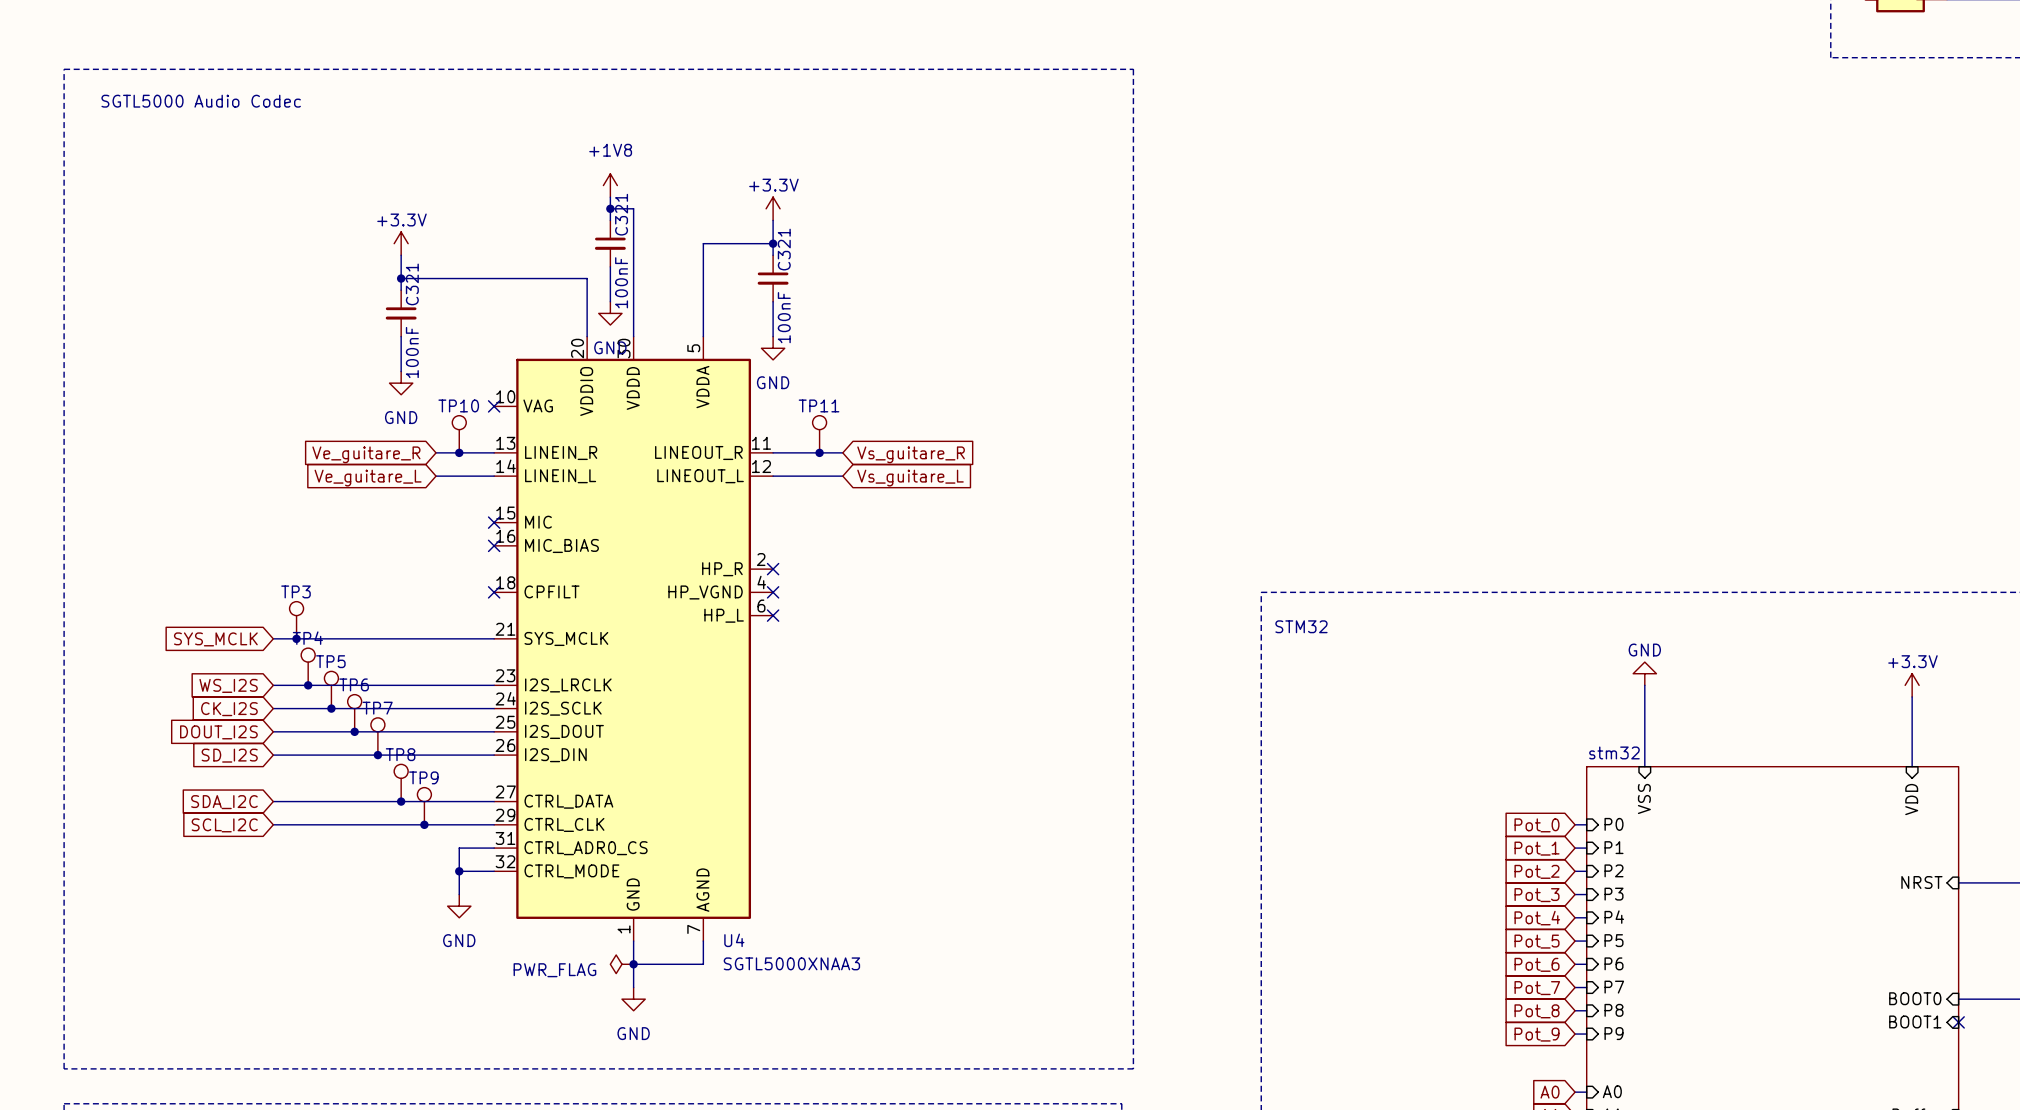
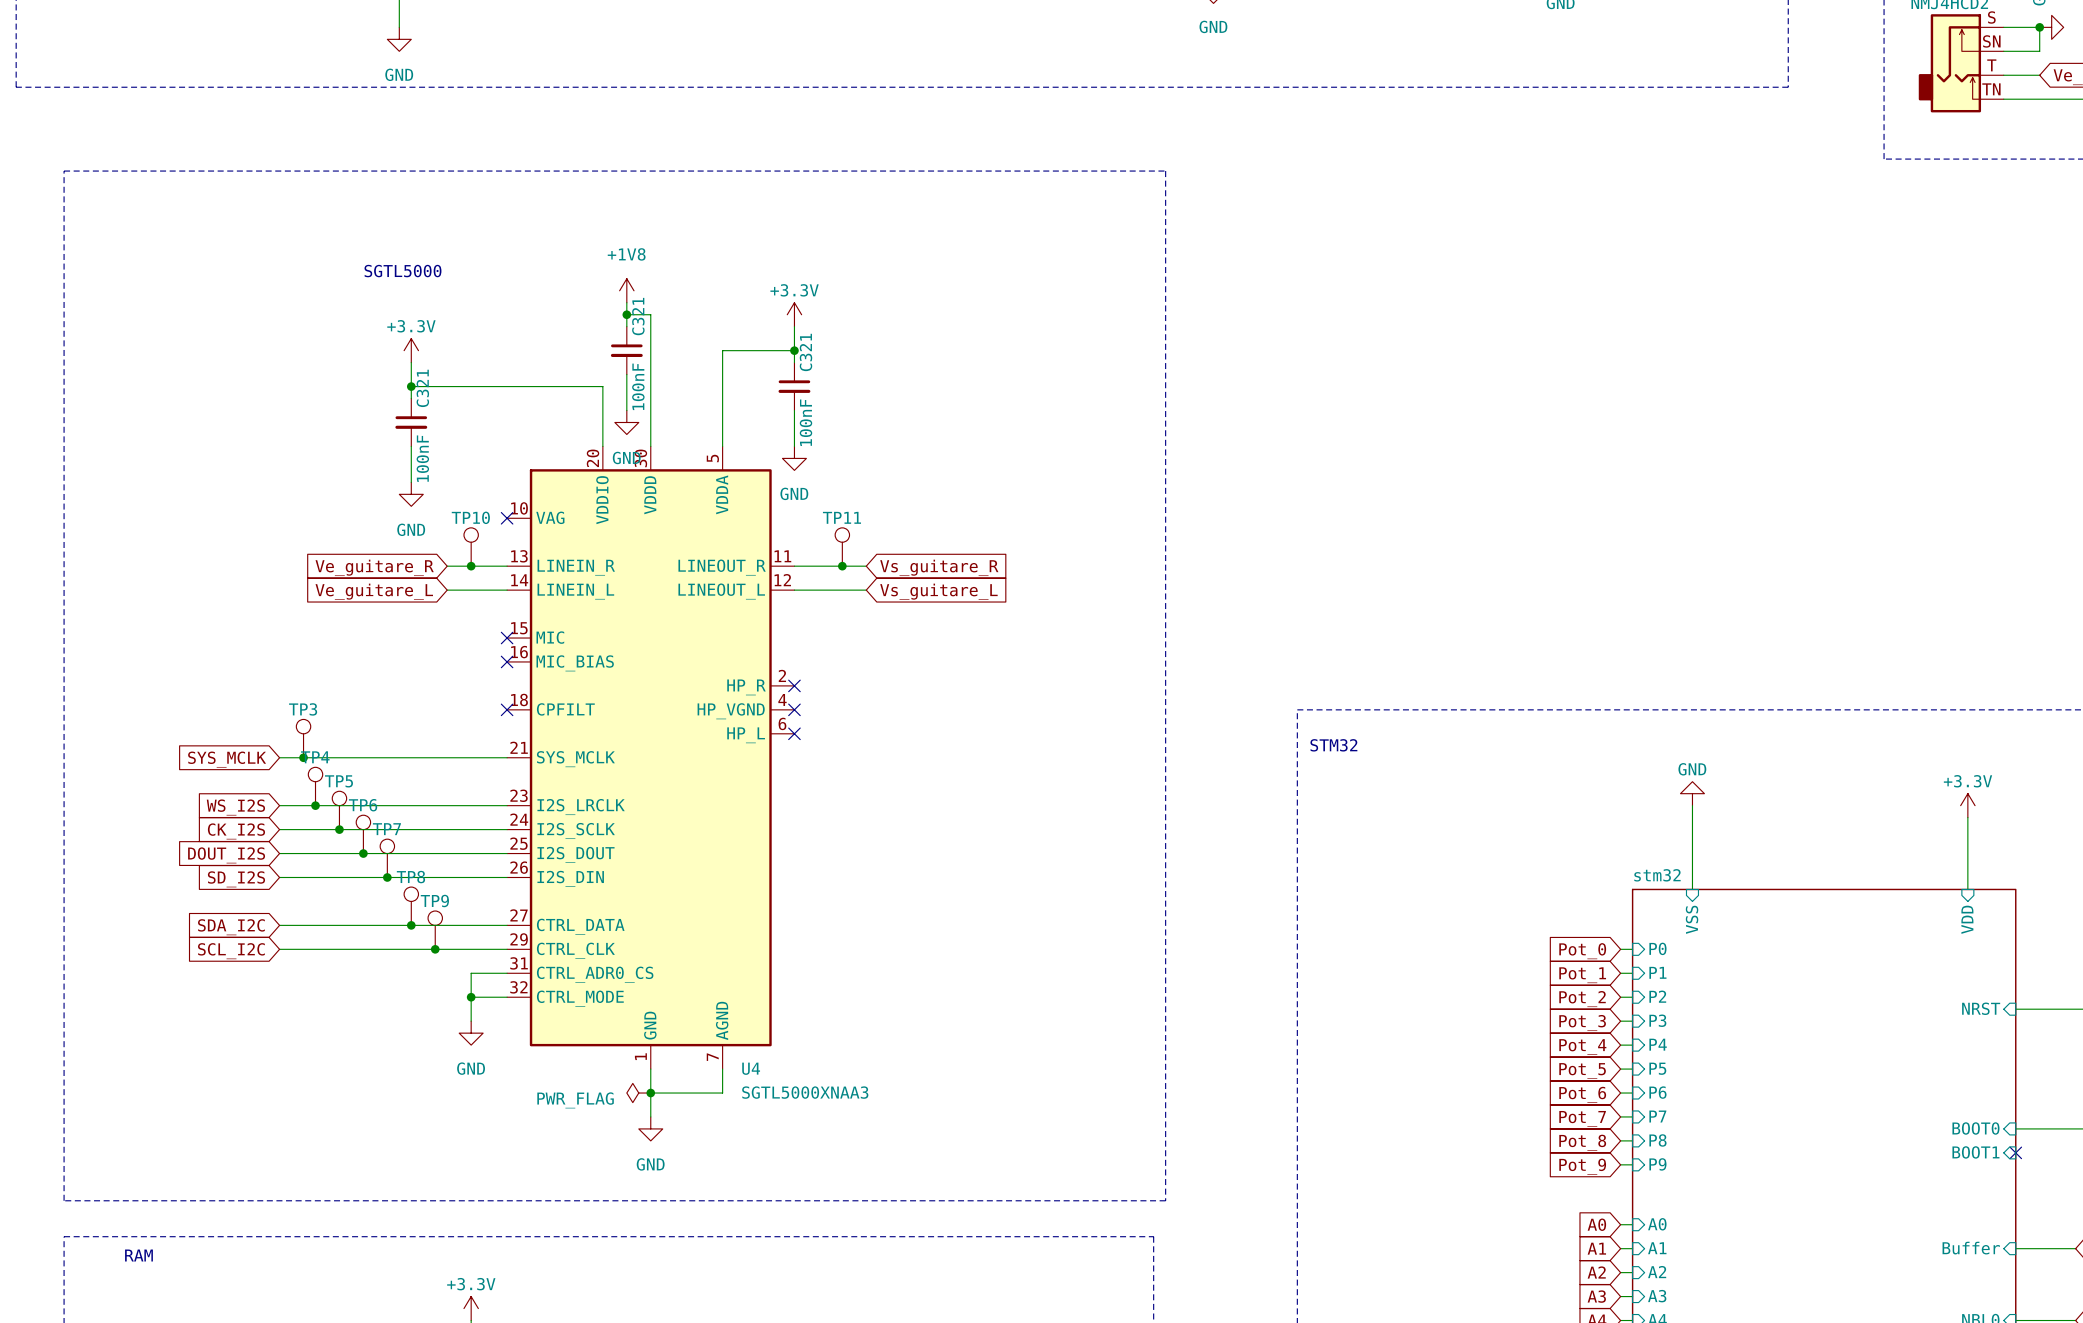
text: SGTL5000 Audio Codec (201, 101) -> none
text: none -> SGTL5000 (402, 271)

